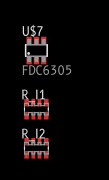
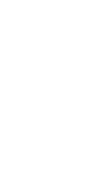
U$7: FDC6305 (36, 50) -> none
R_I1: (36, 109) -> none
R_I2: (36, 148) -> none

